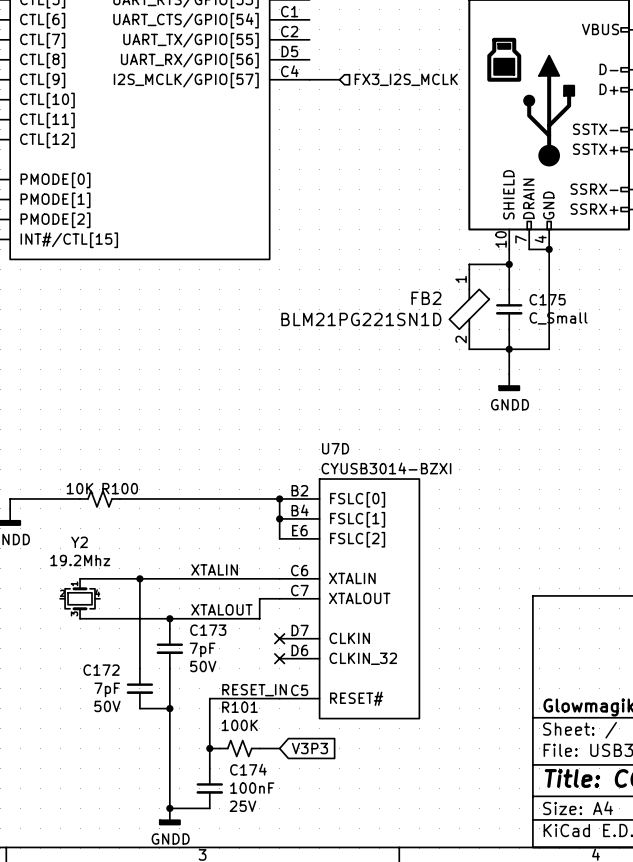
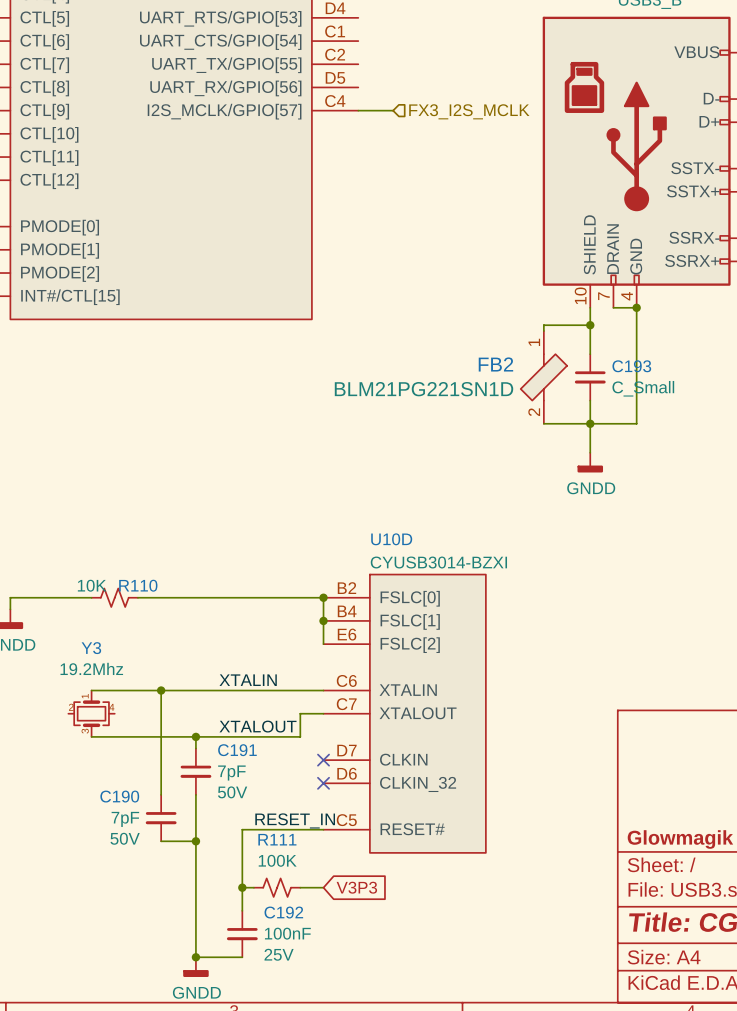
C175 name: C175 (547, 299) -> C193 (631, 366)
U7D name: U7D (335, 448) -> U10D (391, 539)
R100 name: R100 (120, 488) -> R110 (138, 585)
Y2 name: Y2 (79, 542) -> Y3 (91, 648)
C173 name: C173 (208, 630) -> C191 (237, 750)
C172 name: C172 (101, 670) -> C190 (119, 796)
R101 name: R101 (239, 707) -> R111 (277, 839)
C174 name: C174 (248, 769) -> C192 (283, 912)

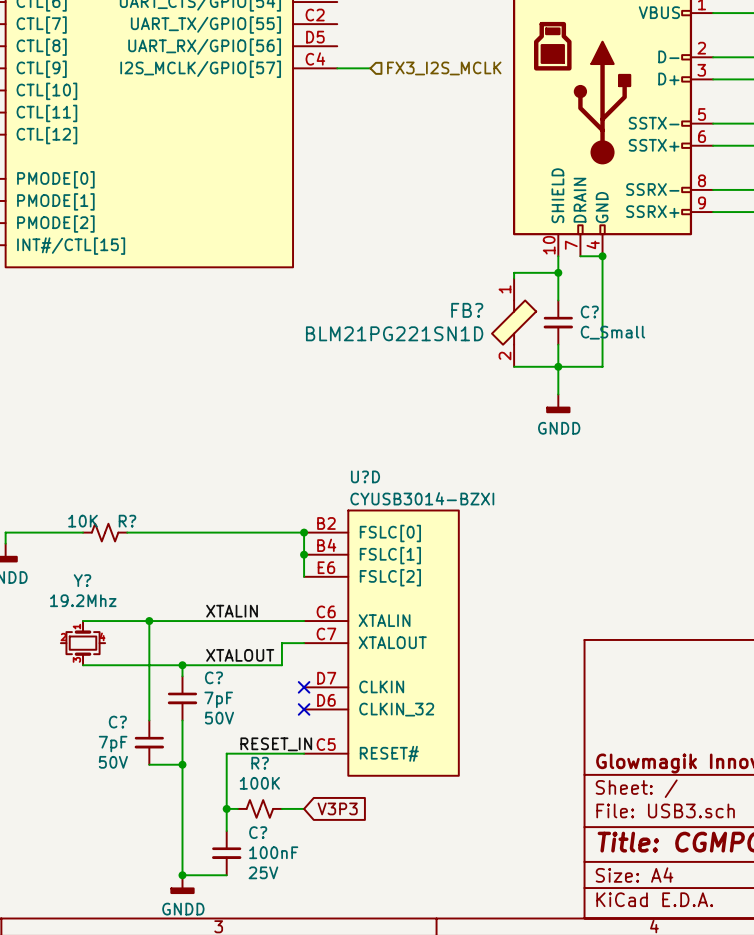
FB2 name: FB2 (495, 364) -> FB? (467, 310)
C193 name: C193 (631, 366) -> C? (589, 312)
U10D name: U10D (391, 539) -> U?D (365, 476)
R110 name: R110 (138, 585) -> R? (127, 521)
Y3 name: Y3 (91, 648) -> Y? (82, 580)
C191 name: C191 (237, 750) -> C? (213, 677)
C190 name: C190 (119, 796) -> C? (117, 722)
R111 name: R111 (277, 839) -> R? (260, 763)
C192 name: C192 (283, 912) -> C? (258, 832)

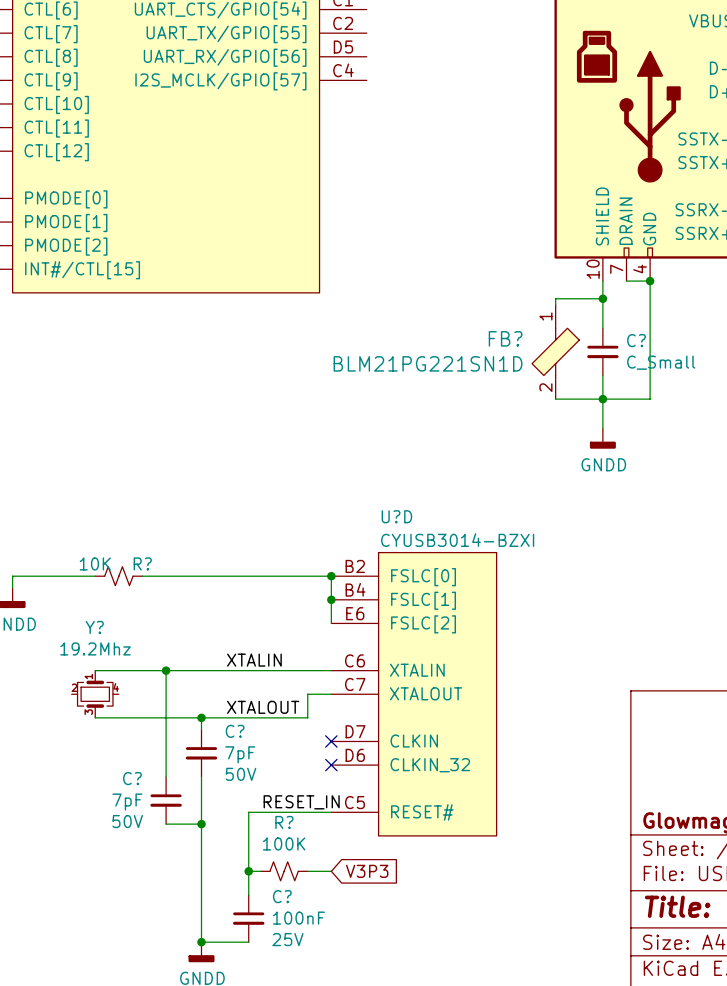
wire: (337, 68) (370, 68) -> none
hierarchical label: FX3_I2S_MCLK (444, 68) -> none

